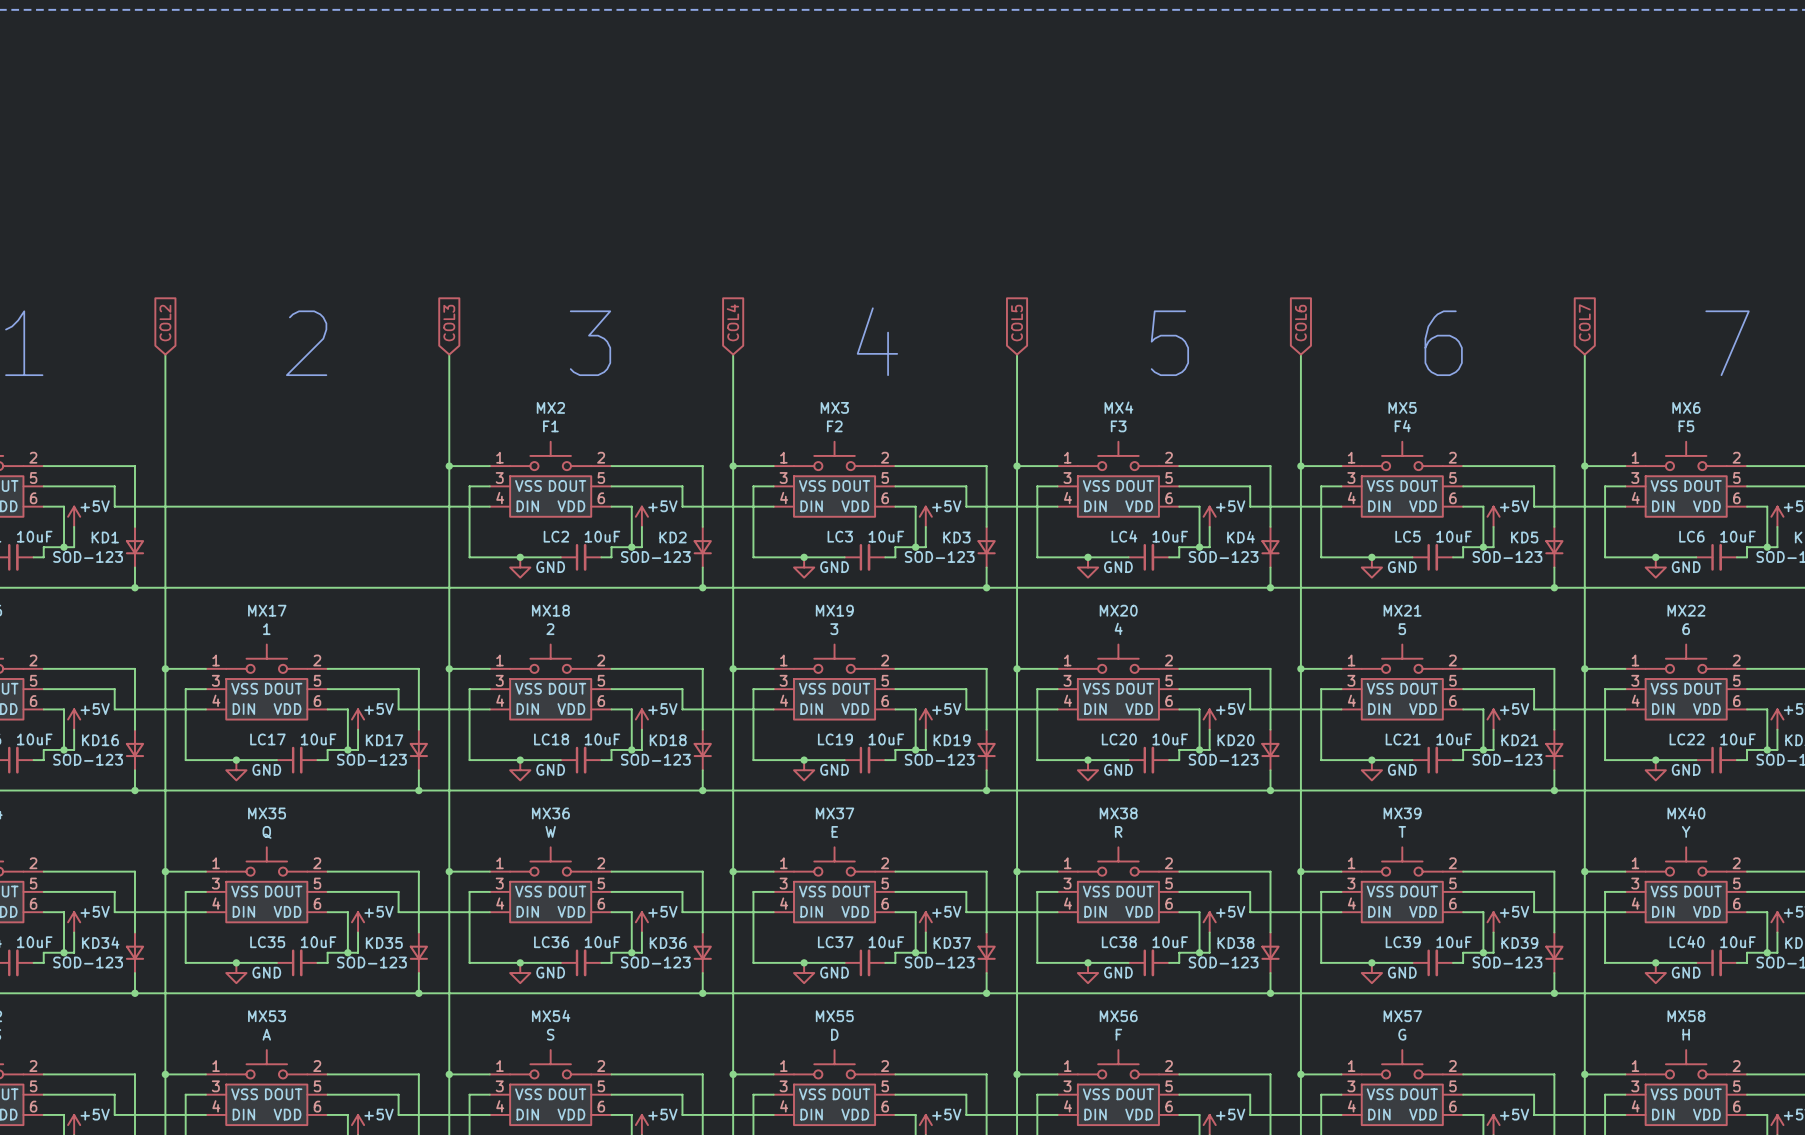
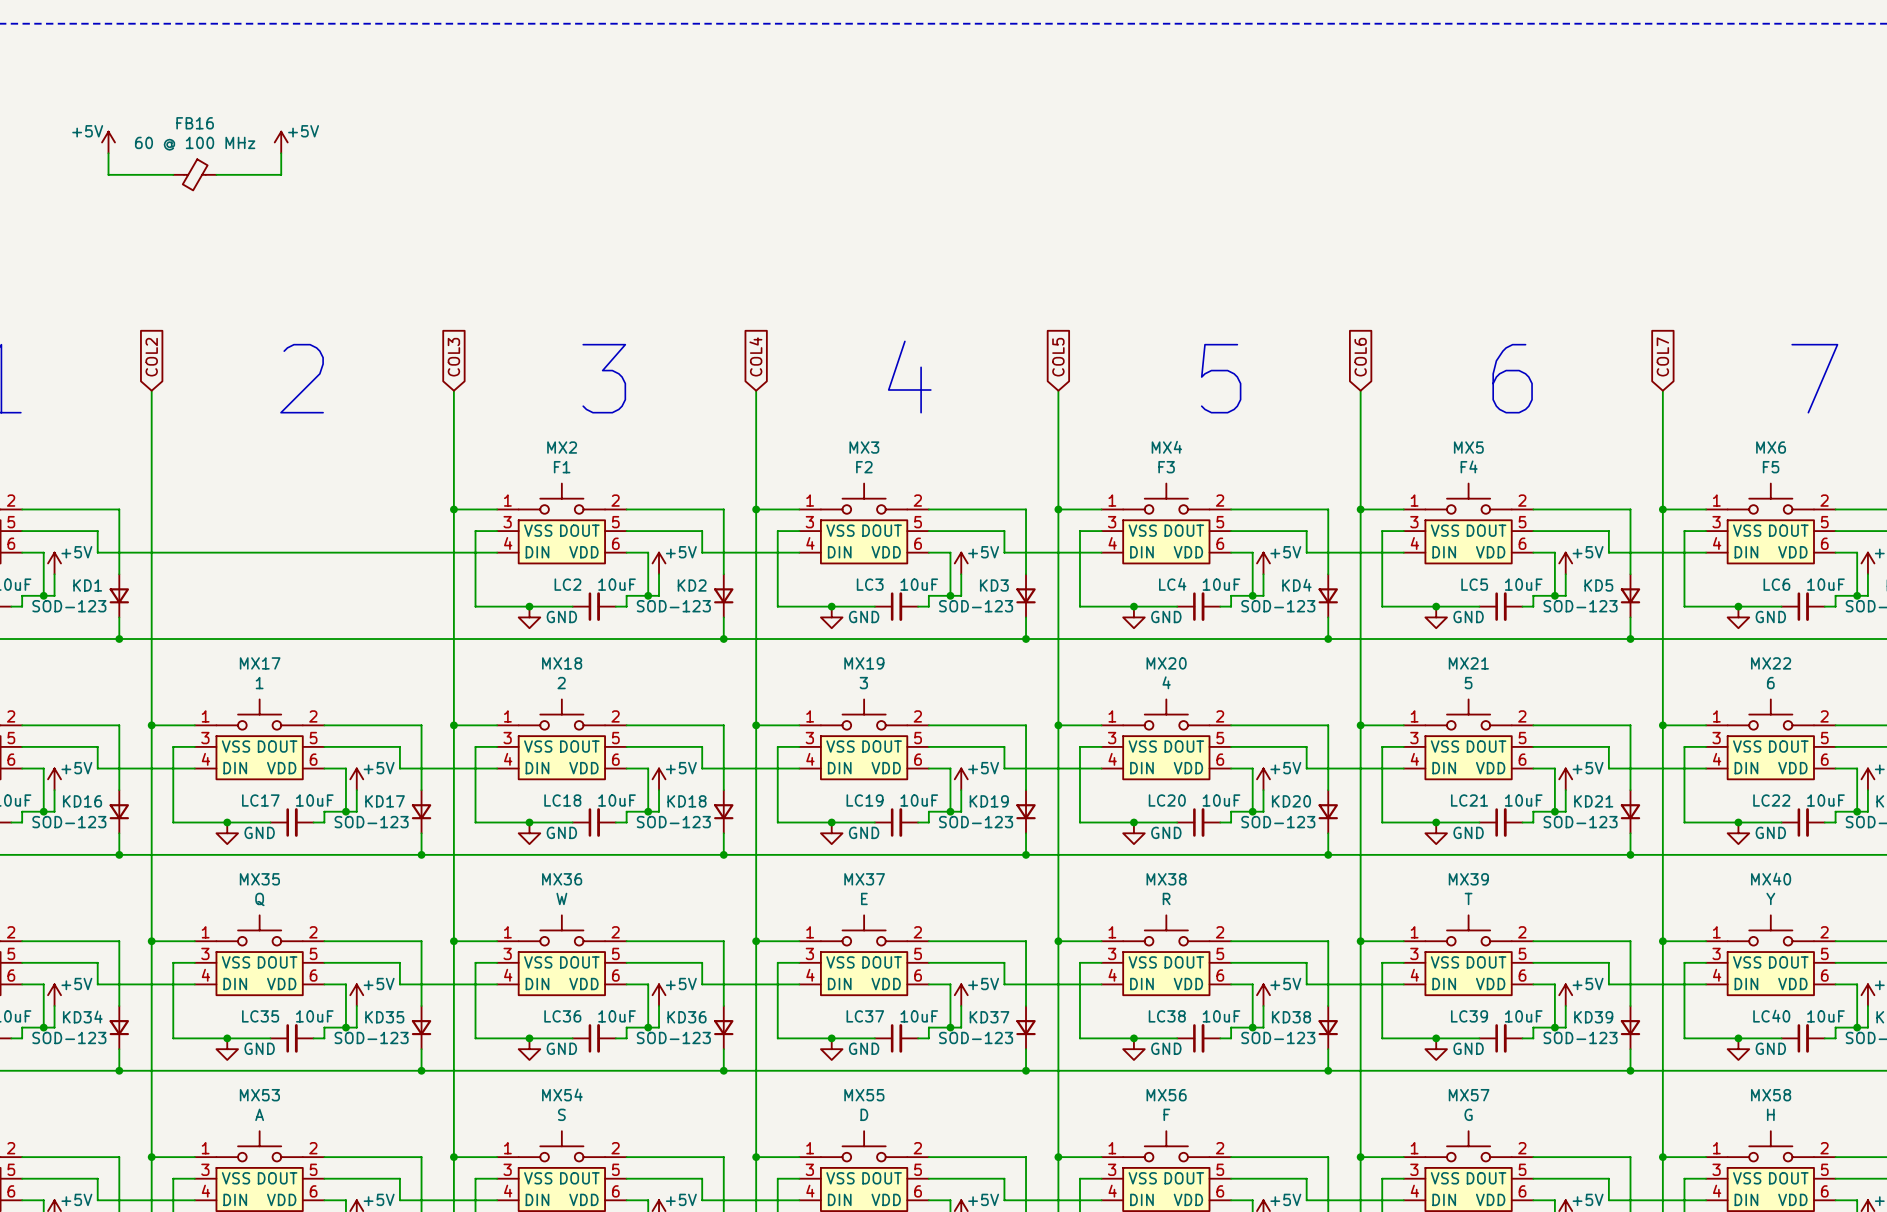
power symbol: none -> +5V (108, 142)
power symbol: none -> +5V (281, 142)
wire: none -> (108, 153) (108, 174) (173, 174)
wire: none -> (281, 153) (281, 174) (216, 174)
FB16: none -> 60 @ 100 MHz (194, 174)

